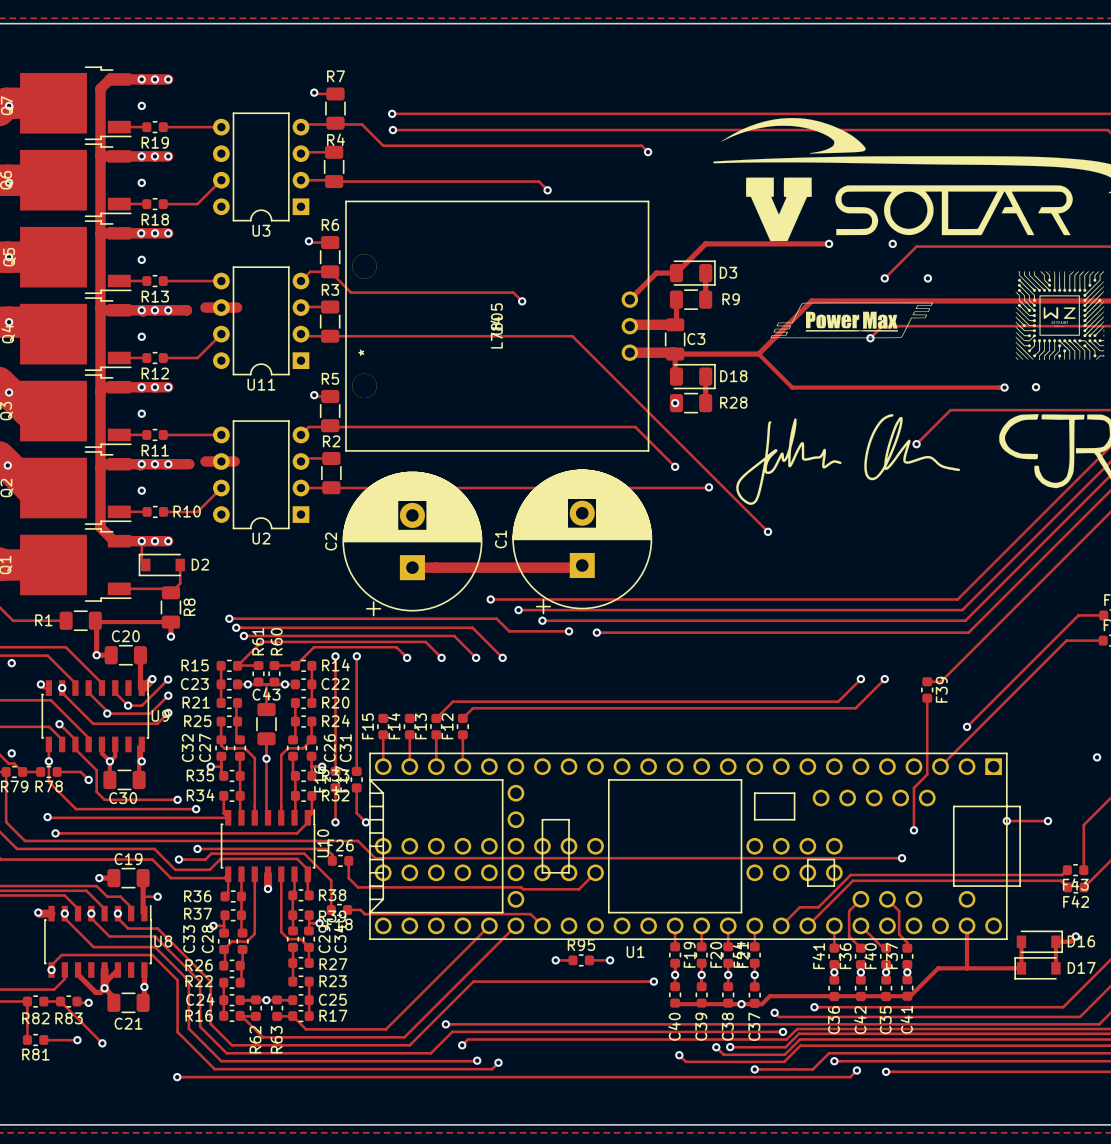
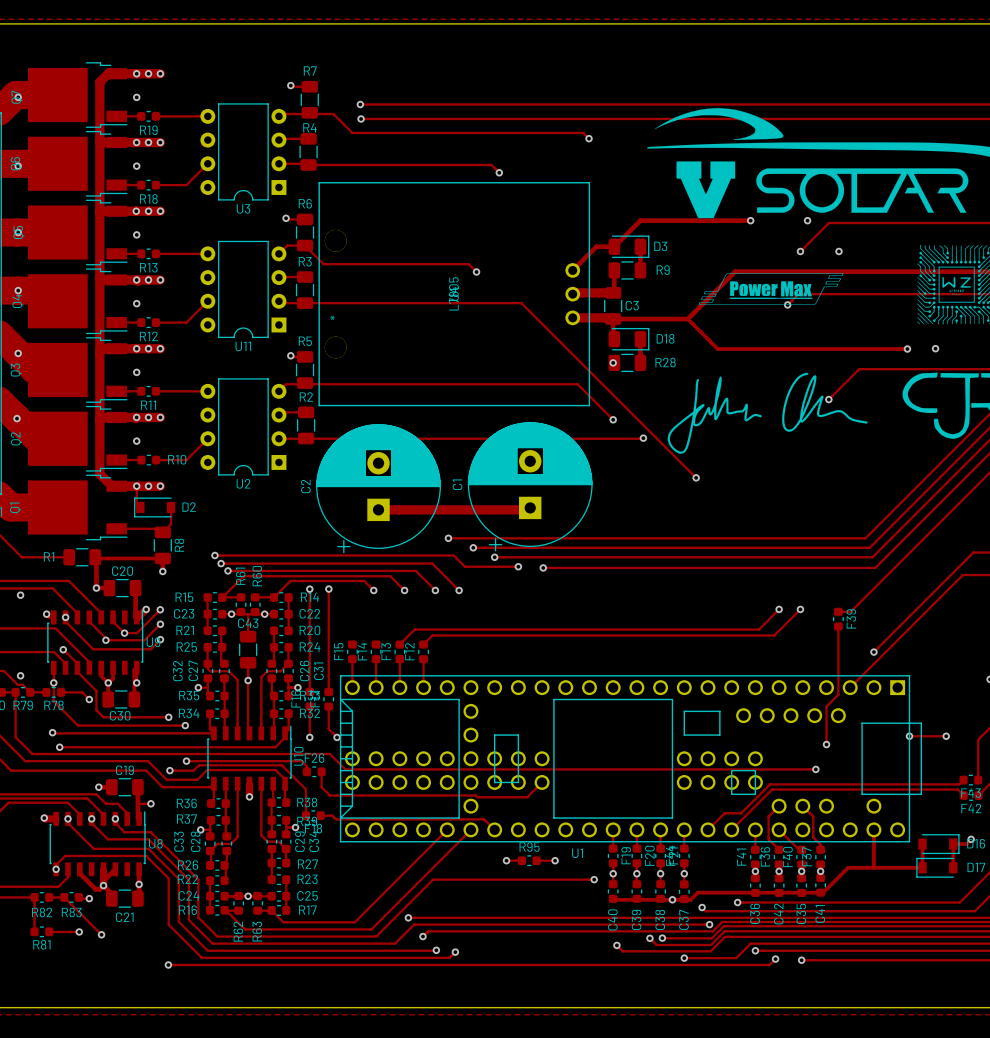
track: (205, 307) (237, 307) -> none
track: (168, 310) (186, 310) -> none
track: (205, 461) (234, 461) -> none
track: (168, 464) (189, 464) -> none

